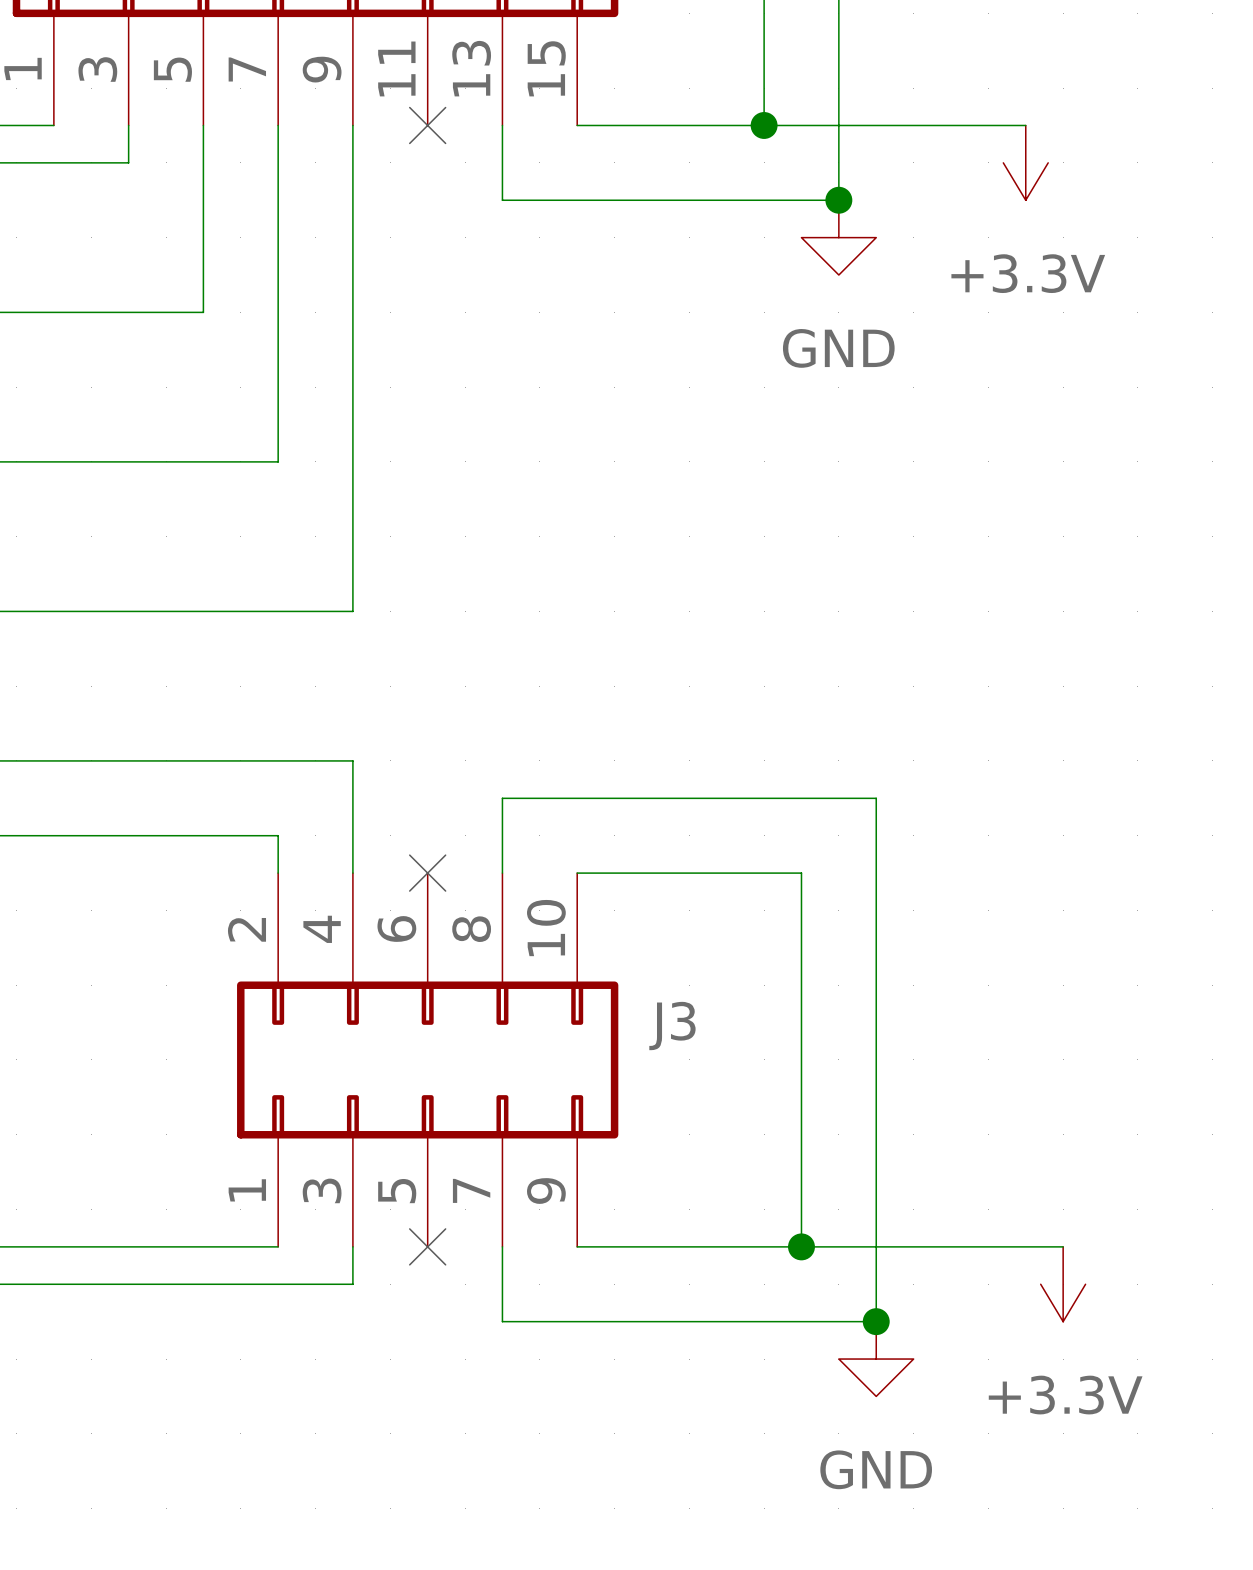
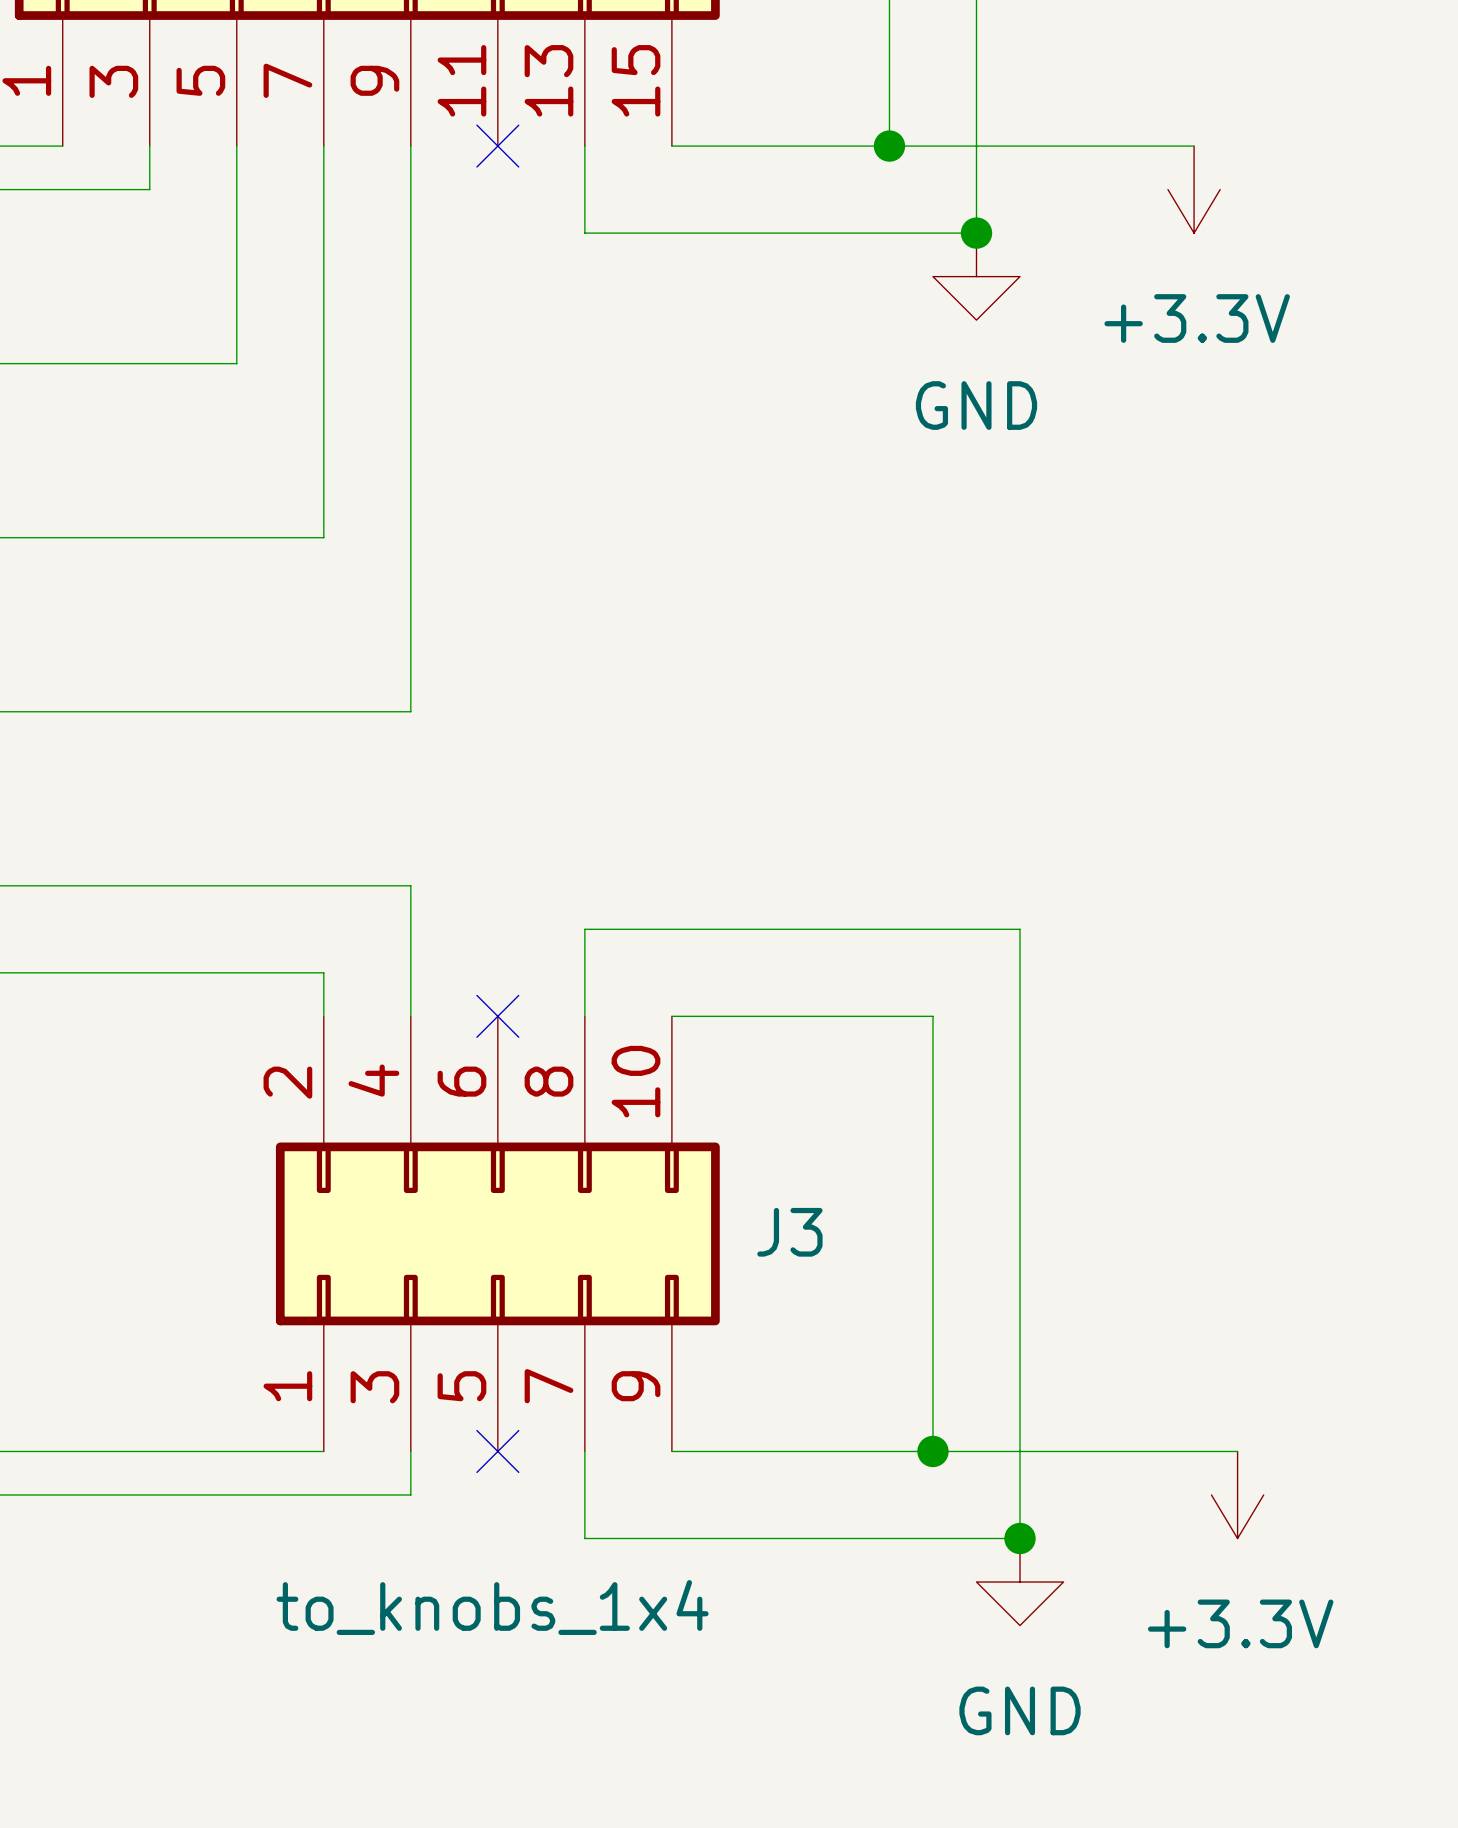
J3 name position: J3 (672, 1026) -> J3 (789, 1232)
J3 value: none -> to_knobs_1x4 (492, 1607)

